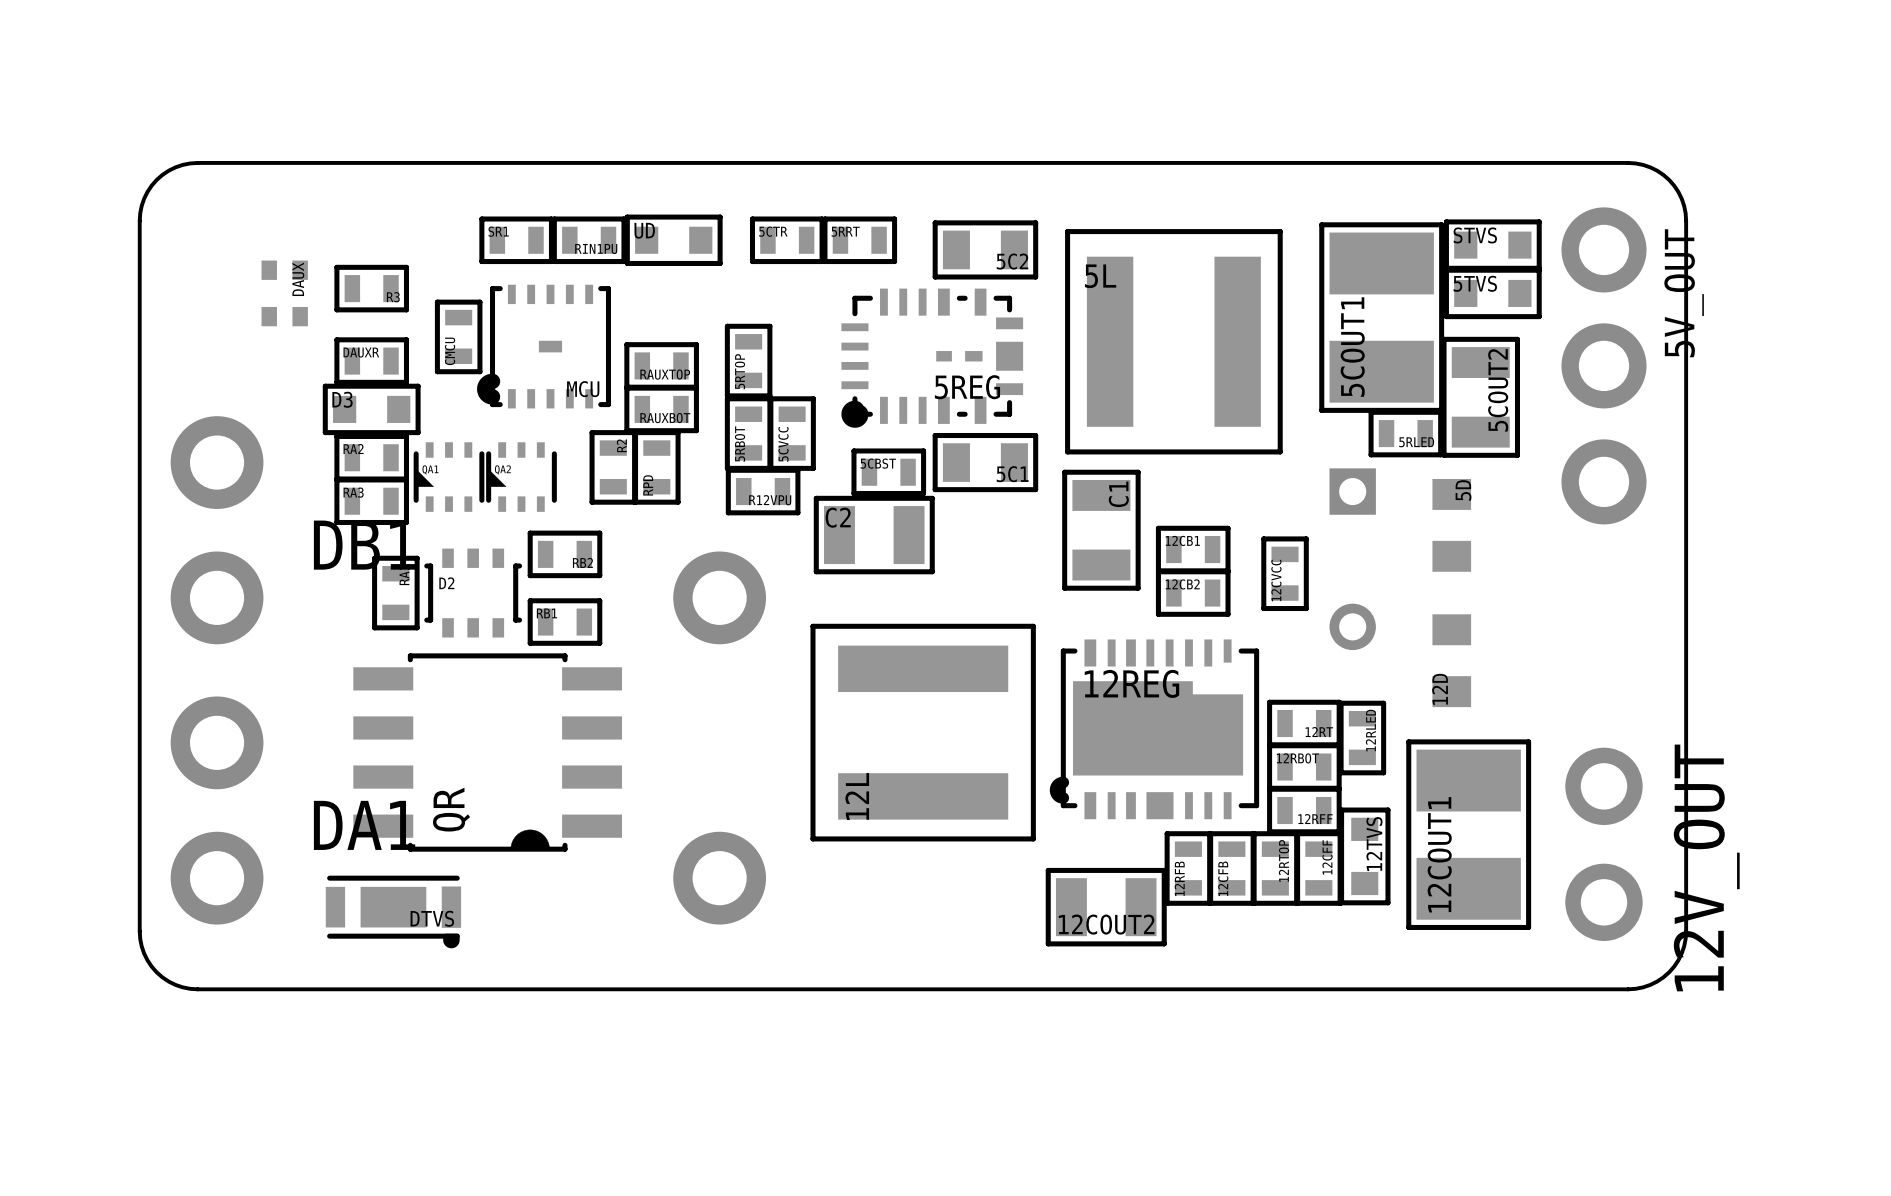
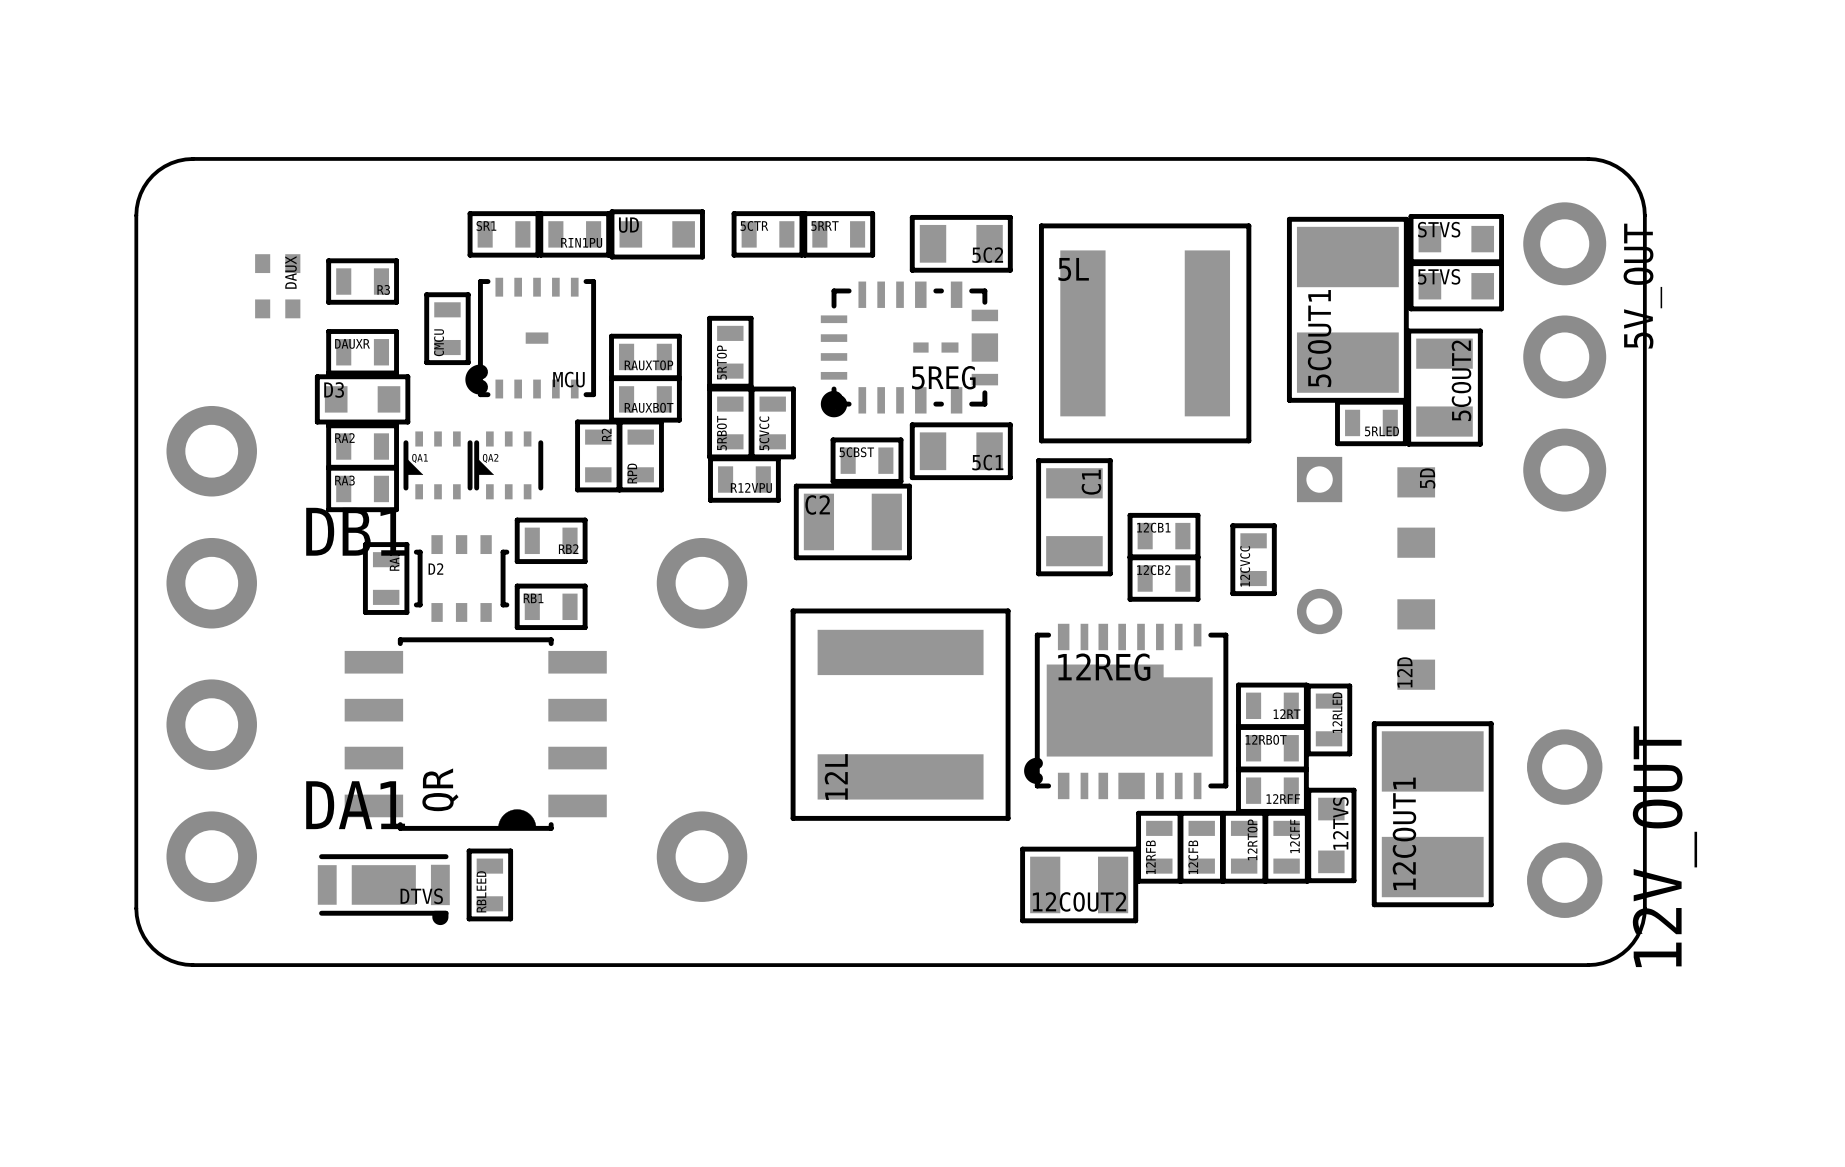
RBLEED: none -> (489, 884)

